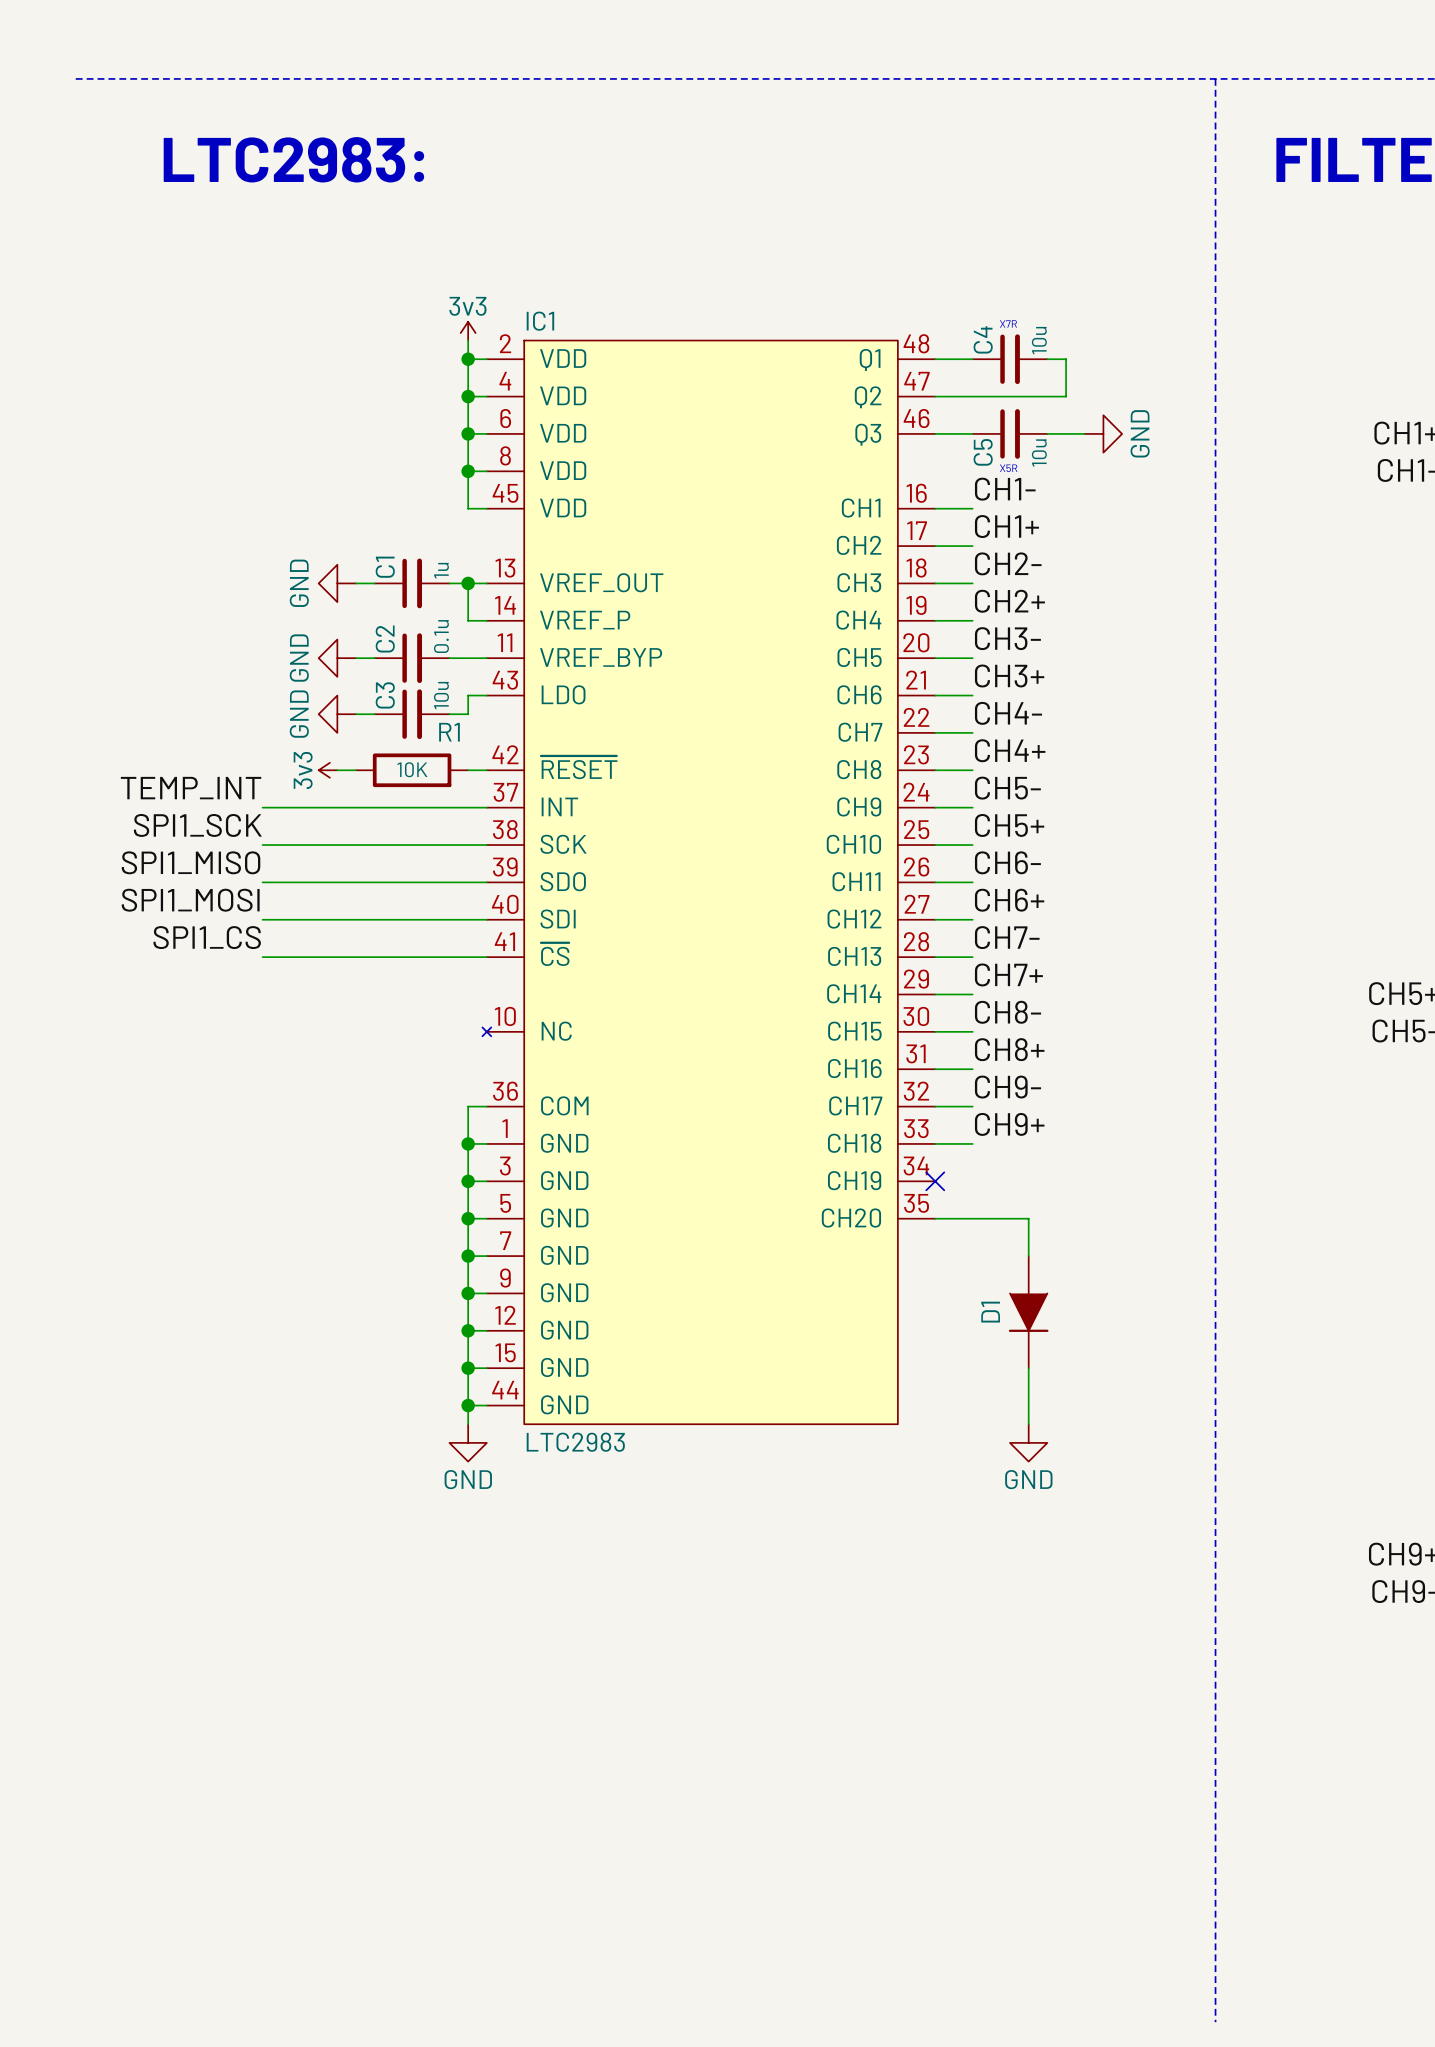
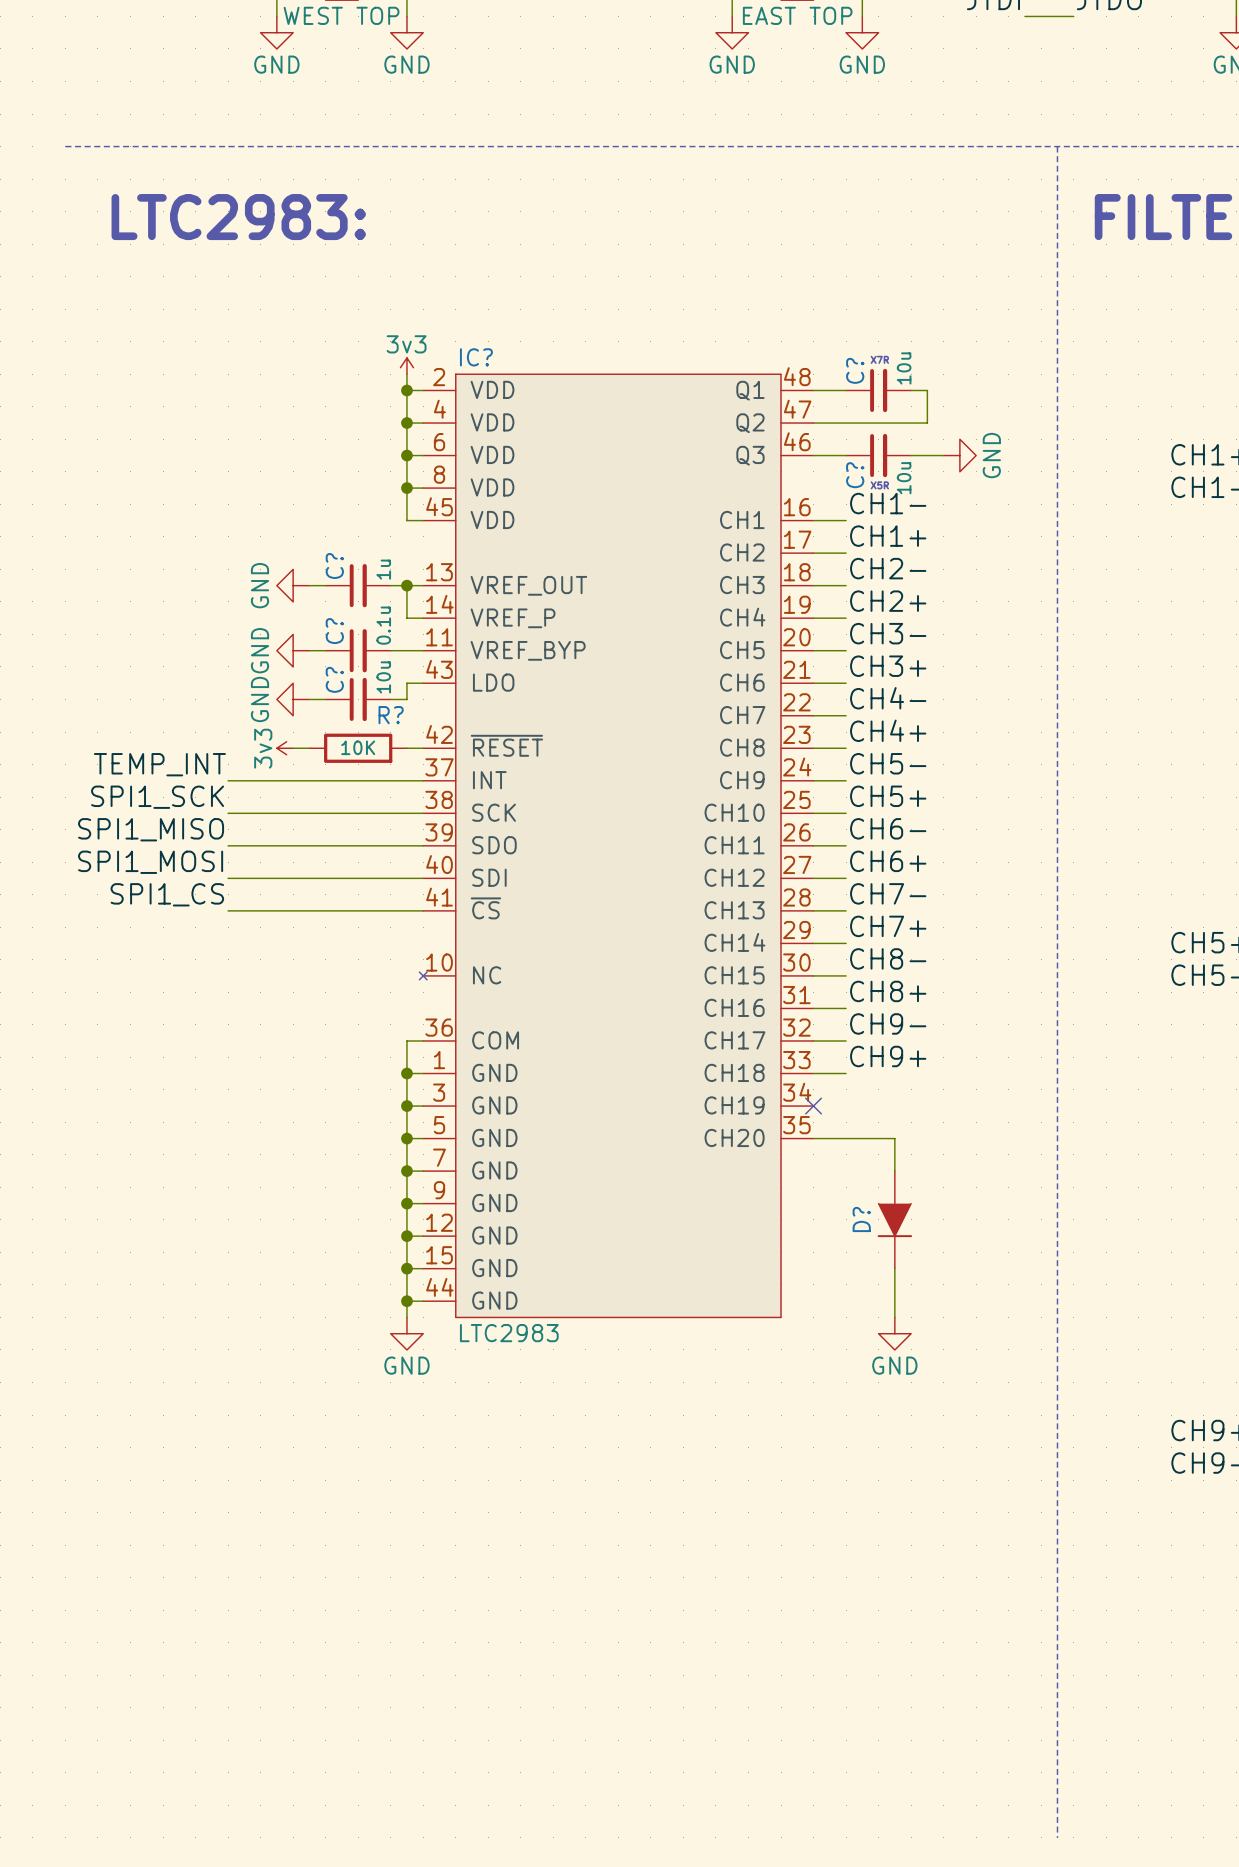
IC1 name: IC1 (540, 321) -> IC? (476, 357)
C4 name: C4 (983, 339) -> C? (855, 370)
C5 name: C5 (983, 452) -> C? (855, 475)
C1 name: C1 (385, 567) -> C? (334, 566)
C2 name: C2 (385, 638) -> C? (334, 631)
C3 name: C3 (385, 695) -> C? (334, 679)
R1 name: R1 (449, 732) -> R? (391, 715)
D1 name: D1 (990, 1312) -> D? (861, 1219)

